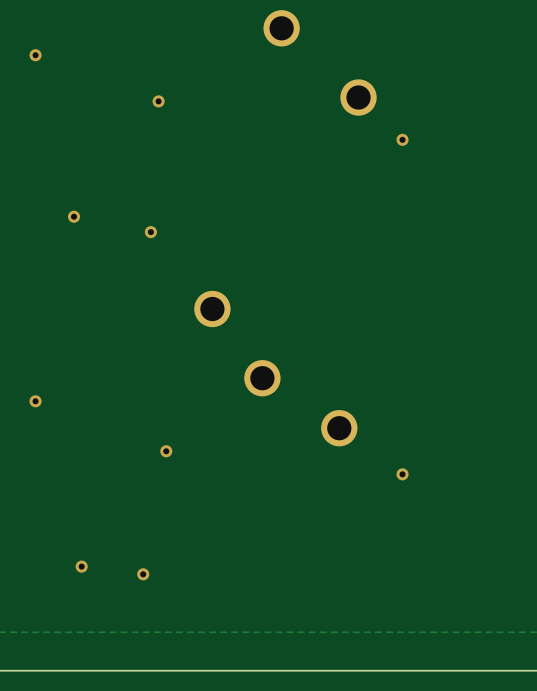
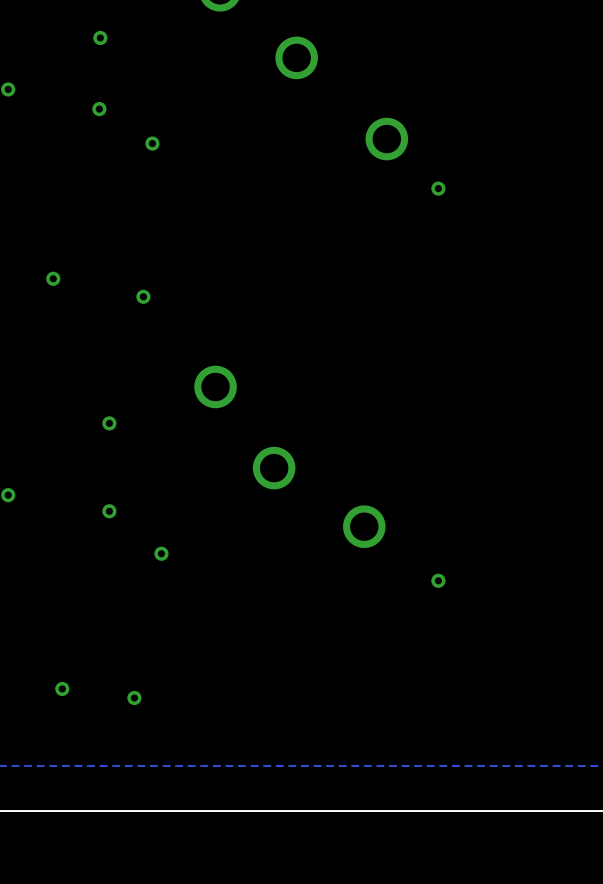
via: none -> (100, 37)
via: none -> (99, 109)
via: none -> (109, 423)
via: none -> (109, 511)

